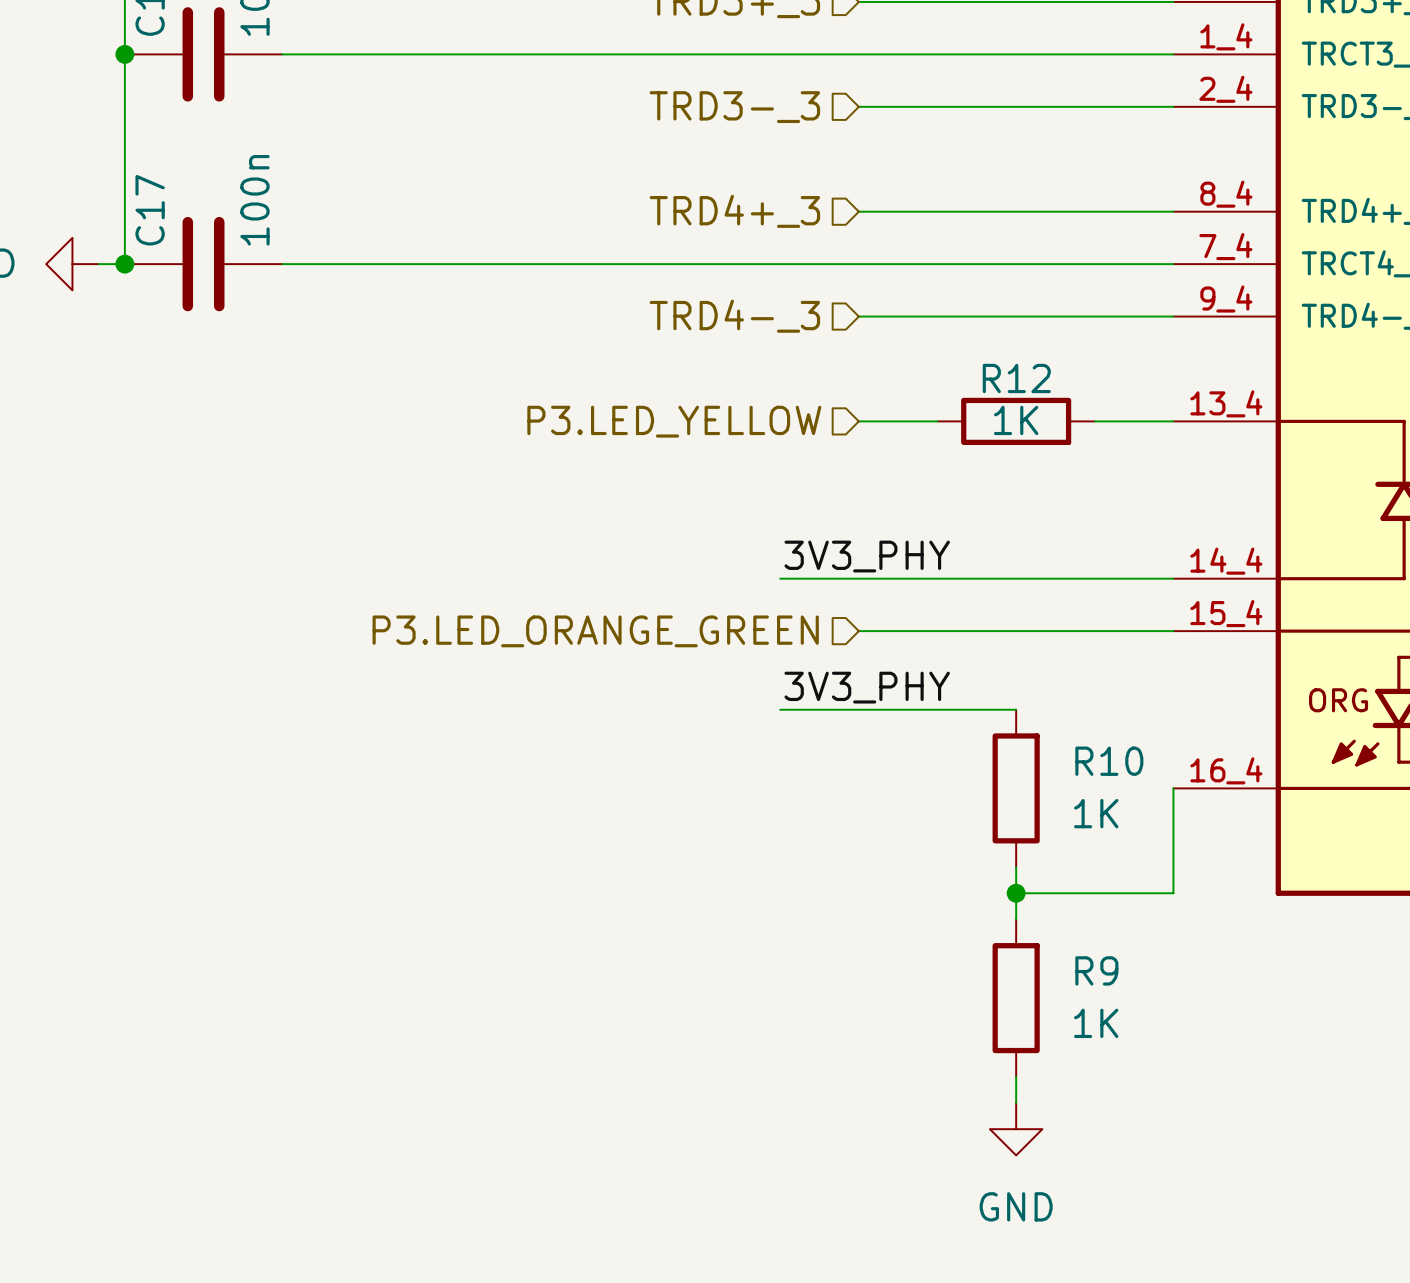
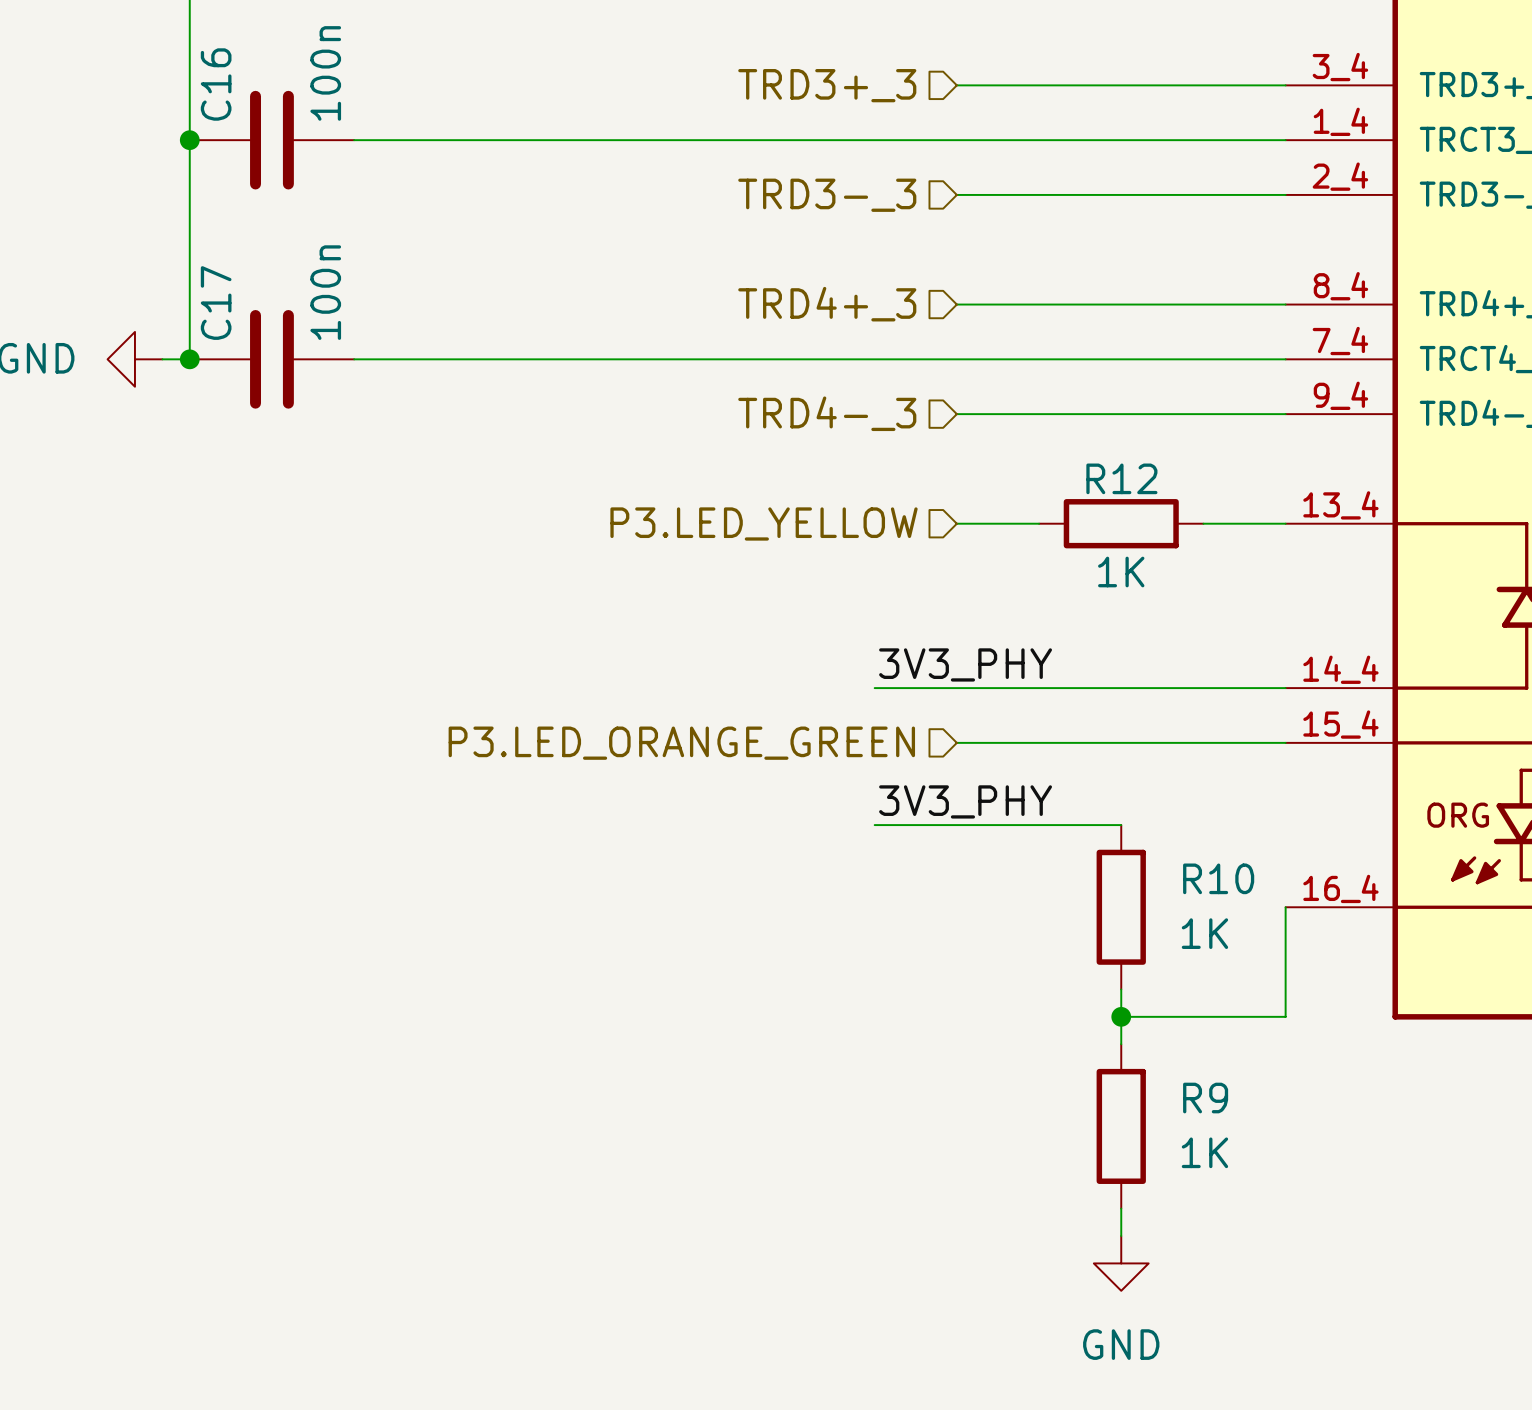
R12 value position: 1K (1016, 420) -> 1K (1121, 572)

